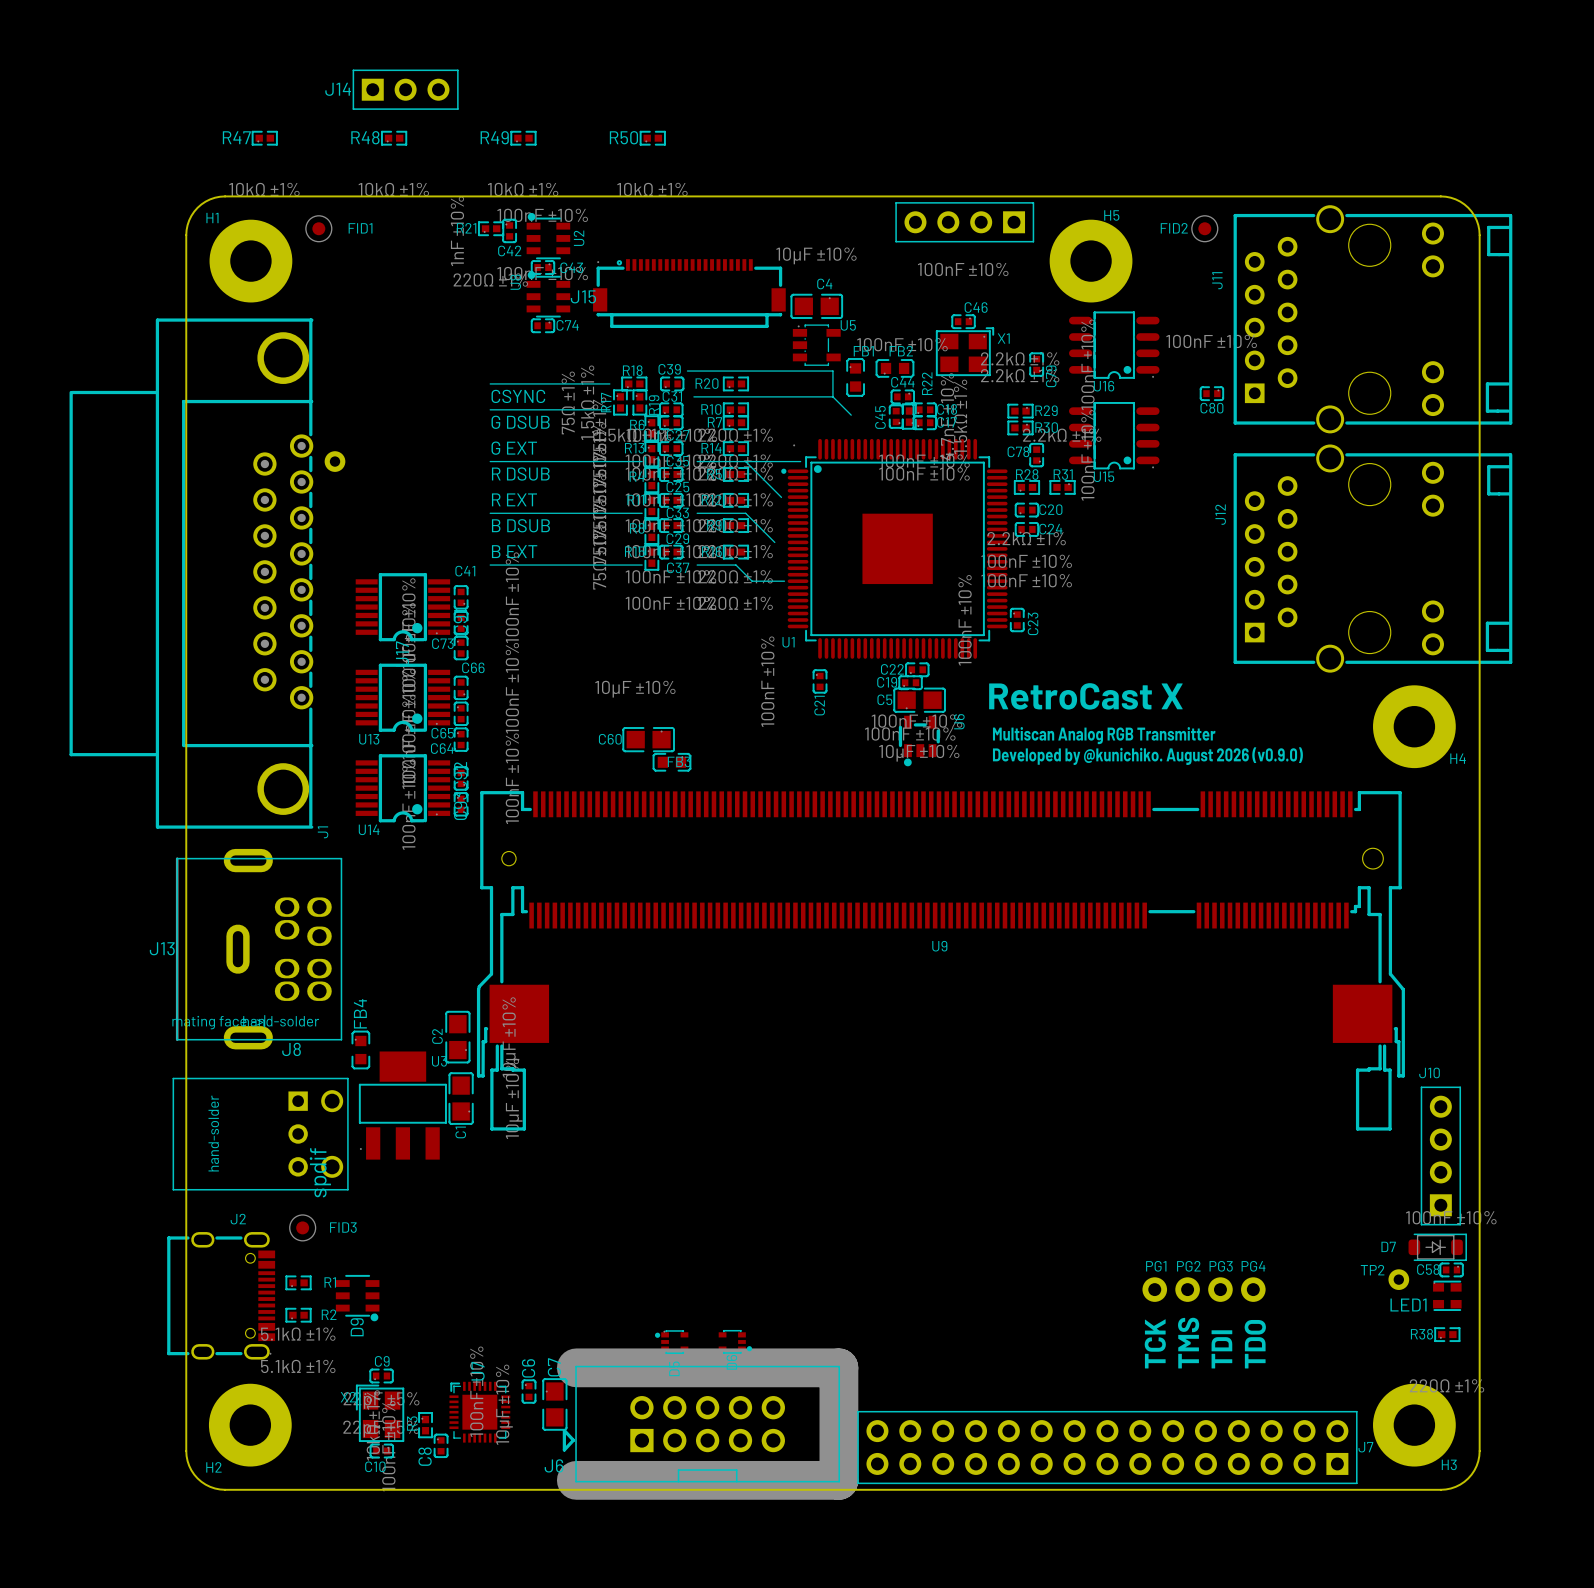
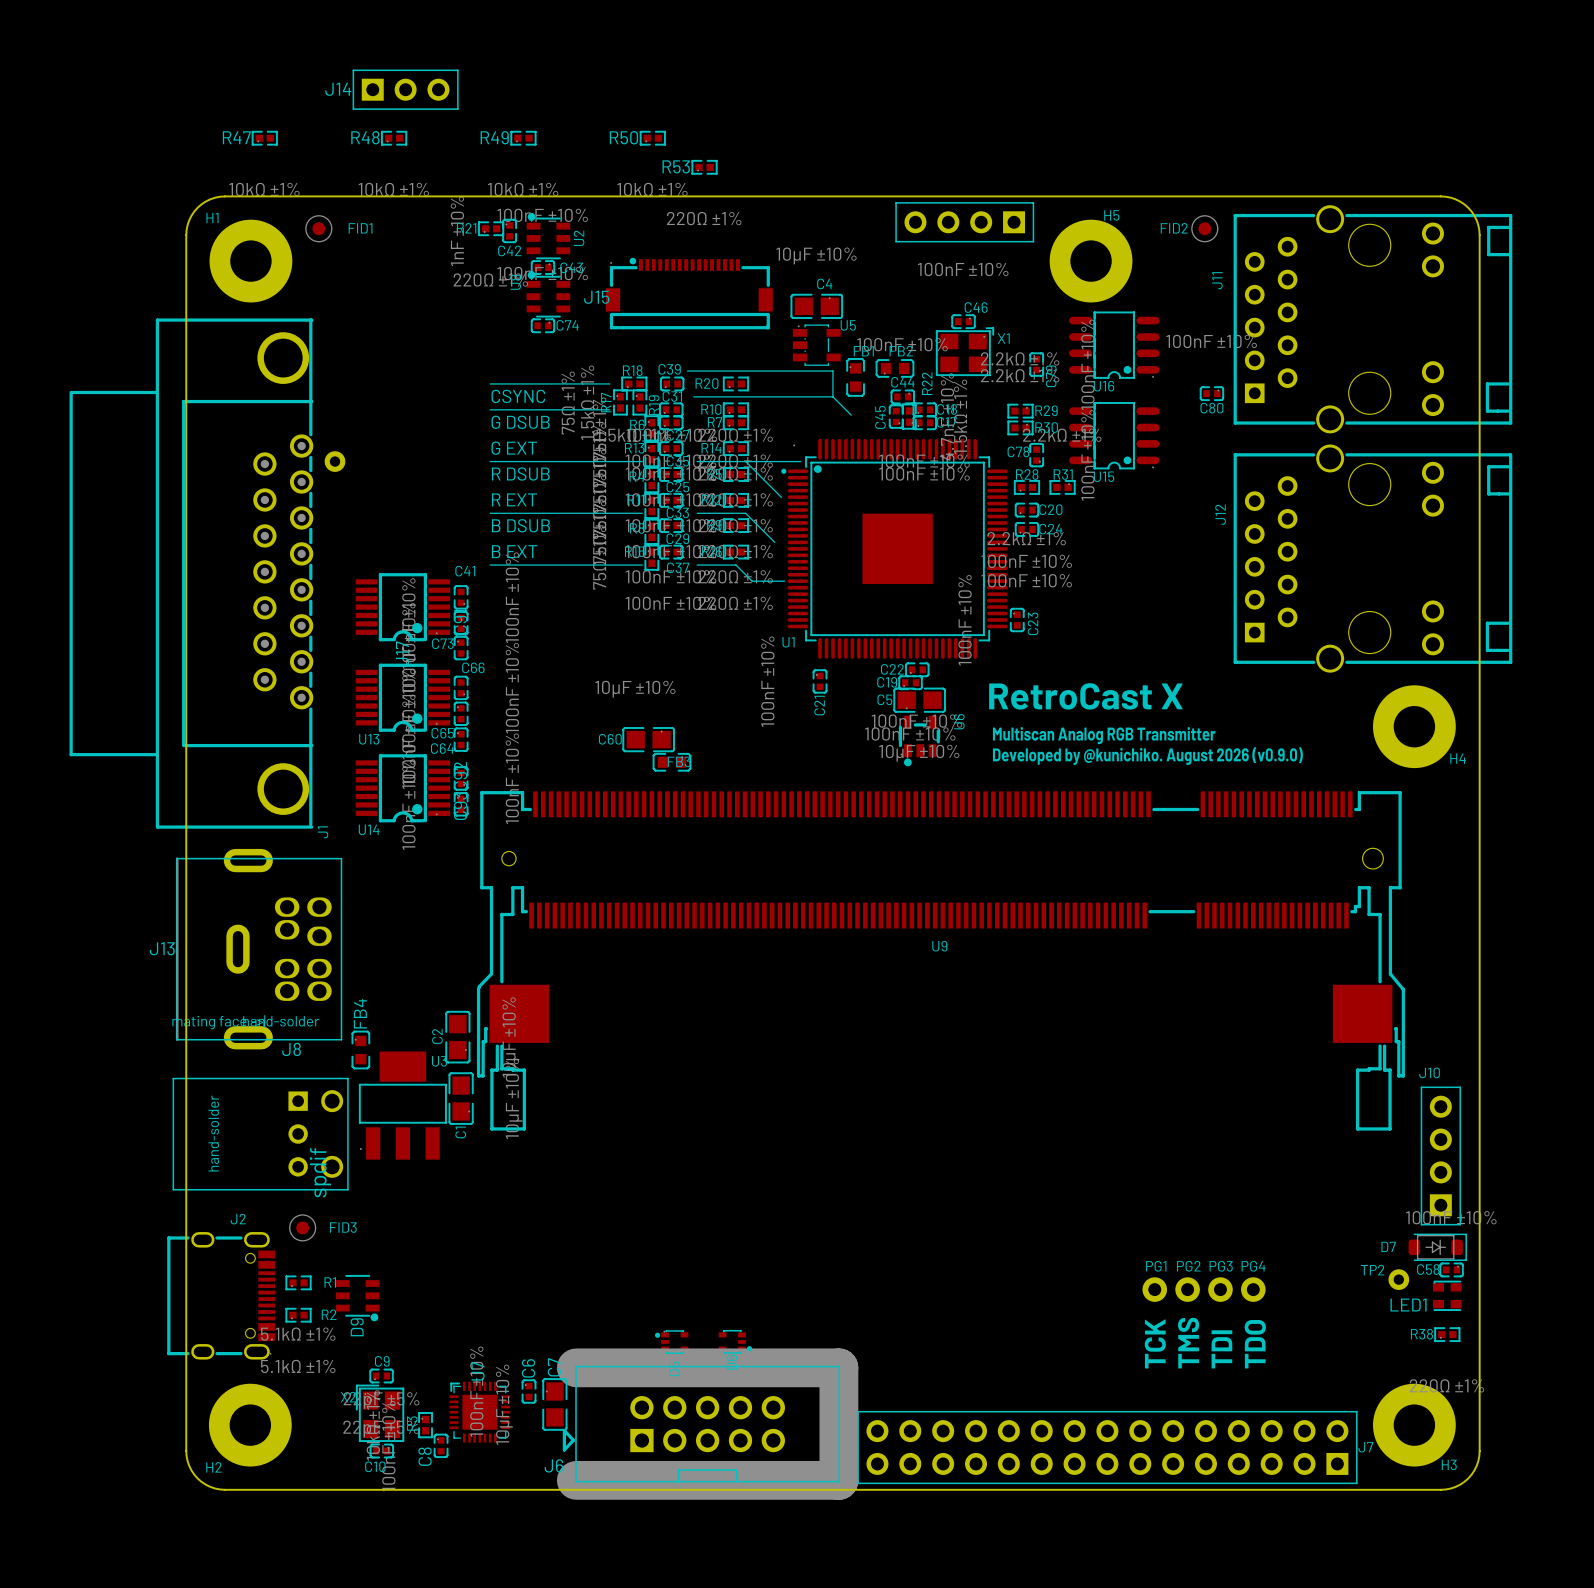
R53: none -> 220Ω ±1% (704, 167)
J15 footprint: [593, 259, 786, 329] -> [605, 257, 773, 330]

